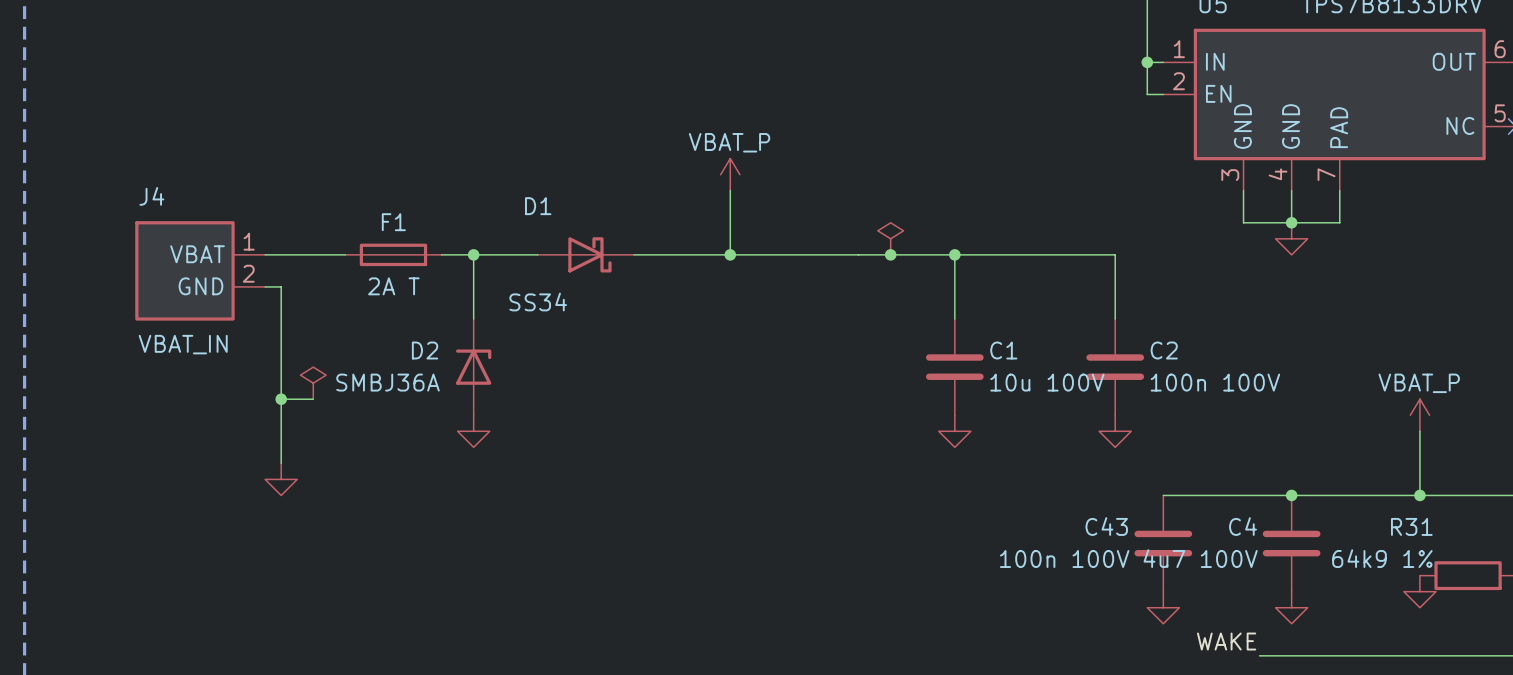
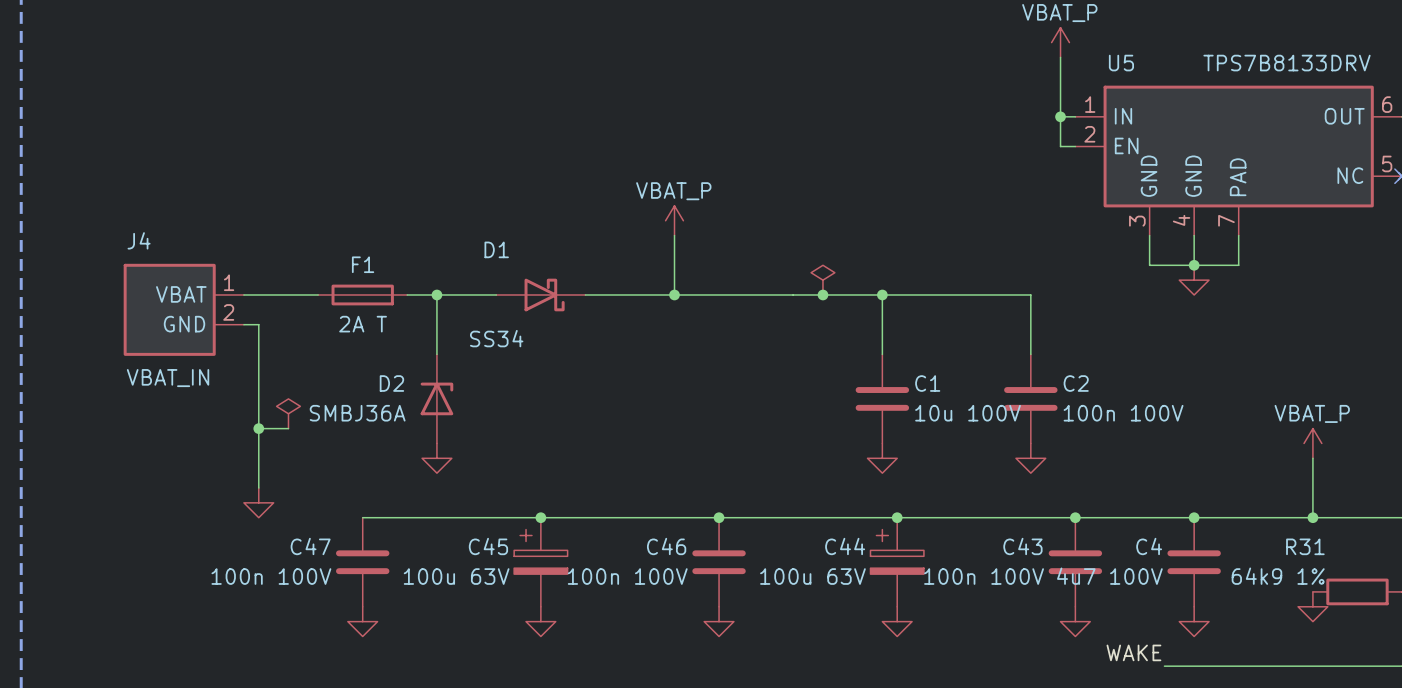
wire: none -> (362, 517) (1075, 517)
junction: none -> (540, 517)
junction: none -> (719, 517)
junction: none -> (897, 517)
junction: none -> (1075, 517)
C47: none -> 100n 100V (362, 562)
C45: none -> 100u 63V (540, 562)
C46: none -> 100n 100V (719, 562)
C44: none -> 100u 63V (897, 562)
power symbol: none -> (362, 621)
power symbol: none -> (540, 621)
power symbol: none -> (719, 621)
power symbol: none -> (897, 621)

